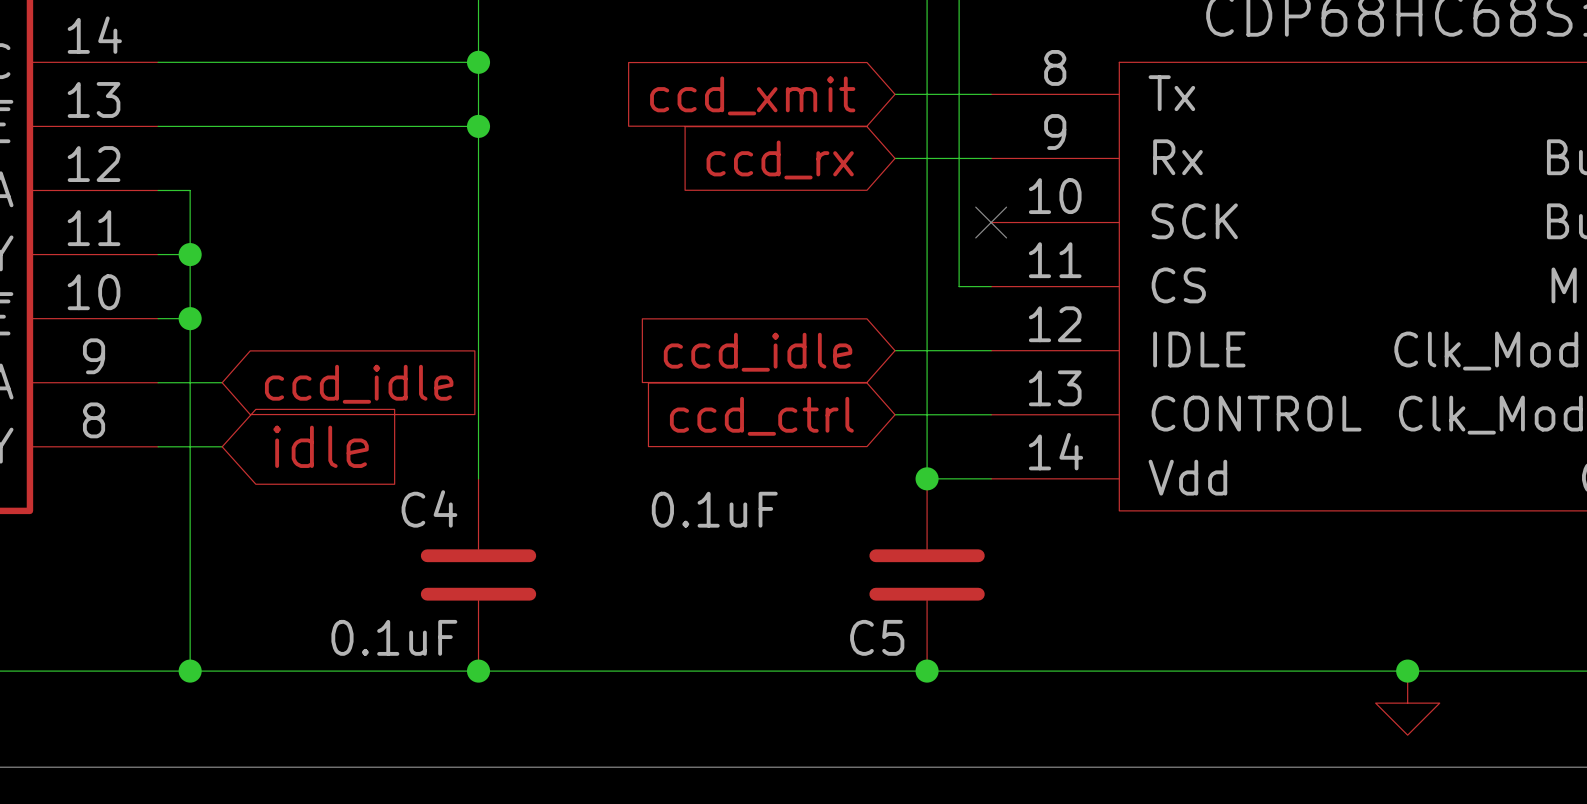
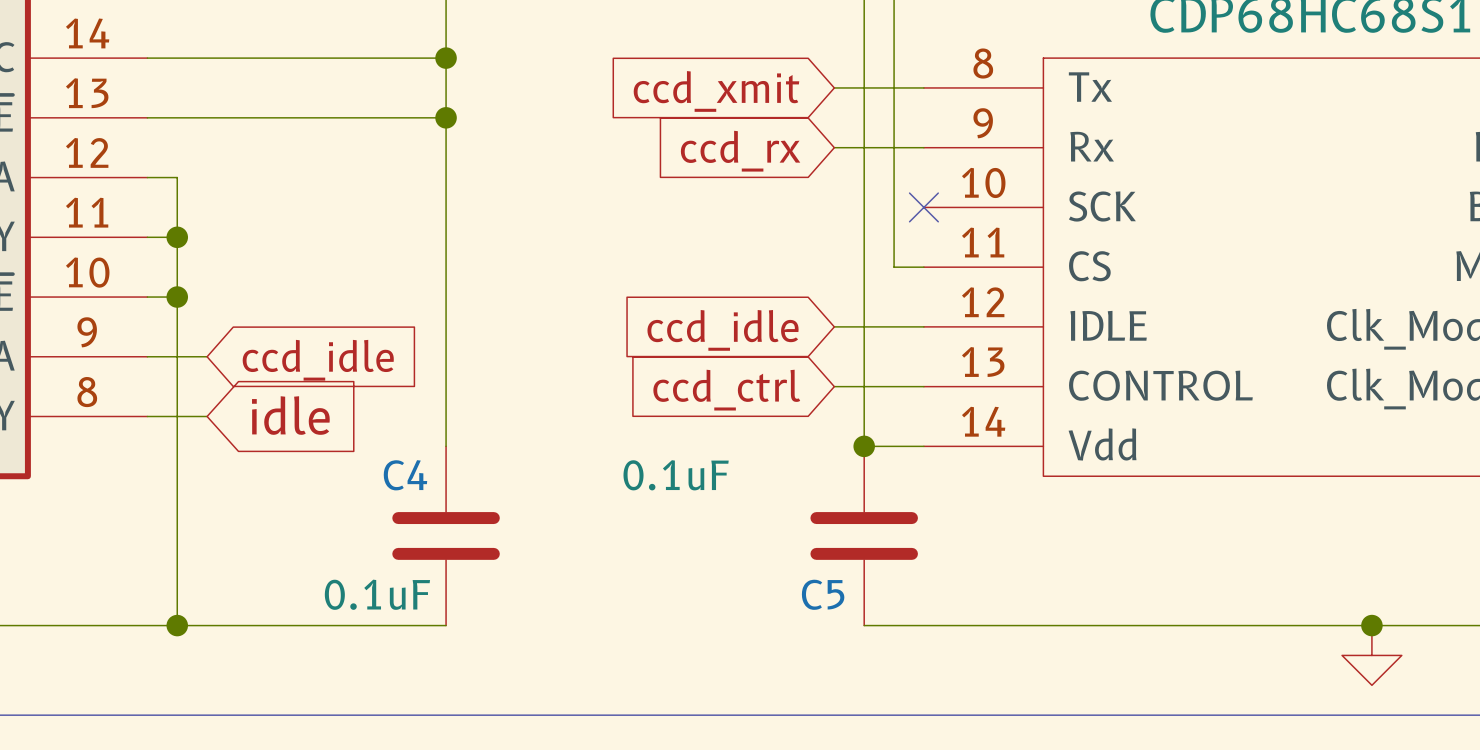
wire: (478, 671) (927, 671) -> none
junction: (478, 671) -> none
junction: (927, 671) -> none
junction position: (1407, 671) -> (1371, 625)
power symbol position: (1407, 703) -> (1371, 655)

